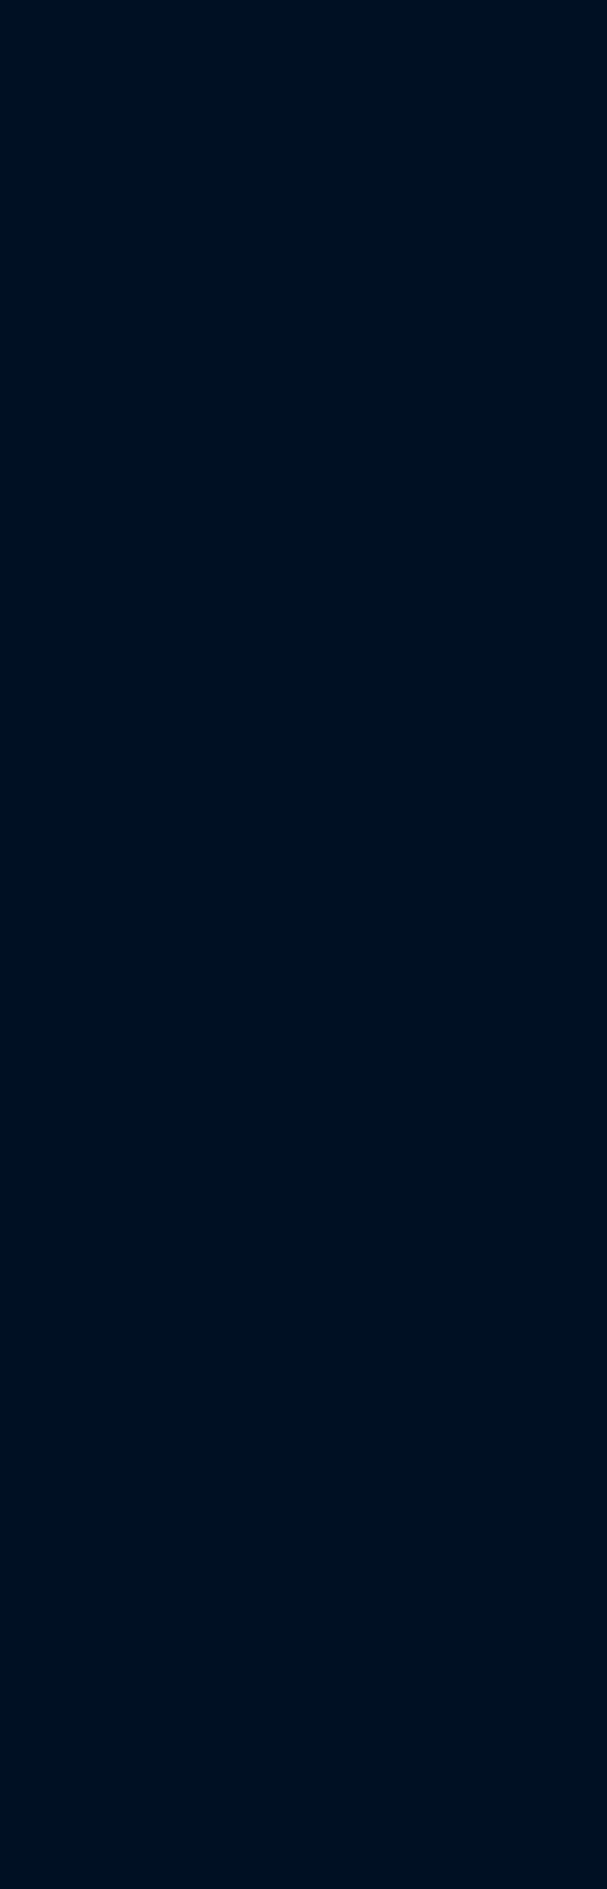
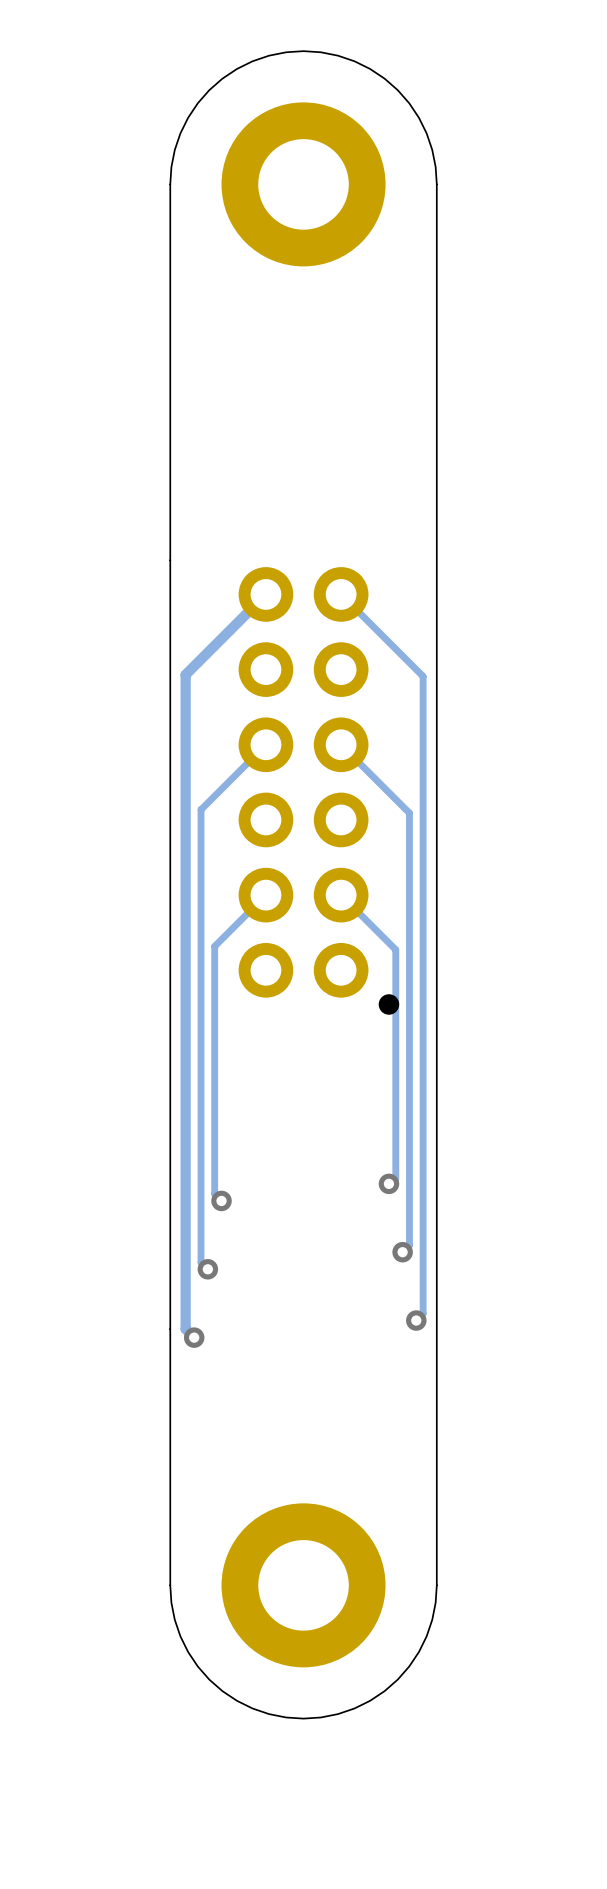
part: none -> (303, 184)
board edge: none -> (436, 184) (435, 1602) (432, 1619) (418, 1651) (397, 1679) (384, 1691) (370, 1700) (338, 1714) (303, 1718) (286, 1717) (269, 1714) (236, 1700) (209, 1679) (197, 1666) (180, 1636) (171, 1602) (171, 167) (180, 133) (188, 117) (209, 90) (222, 78) (236, 68) (269, 55) (303, 51) (320, 52) (354, 61) (370, 68) (397, 90) (418, 117) (426, 133) (432, 149) (436, 184)
track: none -> (265, 594) (185, 674) (185, 1329) (194, 1337)
track: none -> (341, 594) (423, 676) (423, 1313) (416, 1320)
track: none -> (265, 744) (201, 809) (201, 1262) (209, 1271)
track: none -> (341, 744) (409, 813) (409, 1245) (402, 1252)
part: none -> (318, 790)
track: none -> (265, 895) (214, 946) (214, 1194) (221, 1200)
track: none -> (341, 895) (395, 949) (395, 1178) (388, 1185)
via: none -> (388, 1183)
via: none -> (221, 1200)
via: none -> (402, 1252)
via: none -> (207, 1269)
via: none -> (416, 1320)
via: none -> (194, 1337)
part: none -> (303, 1585)

